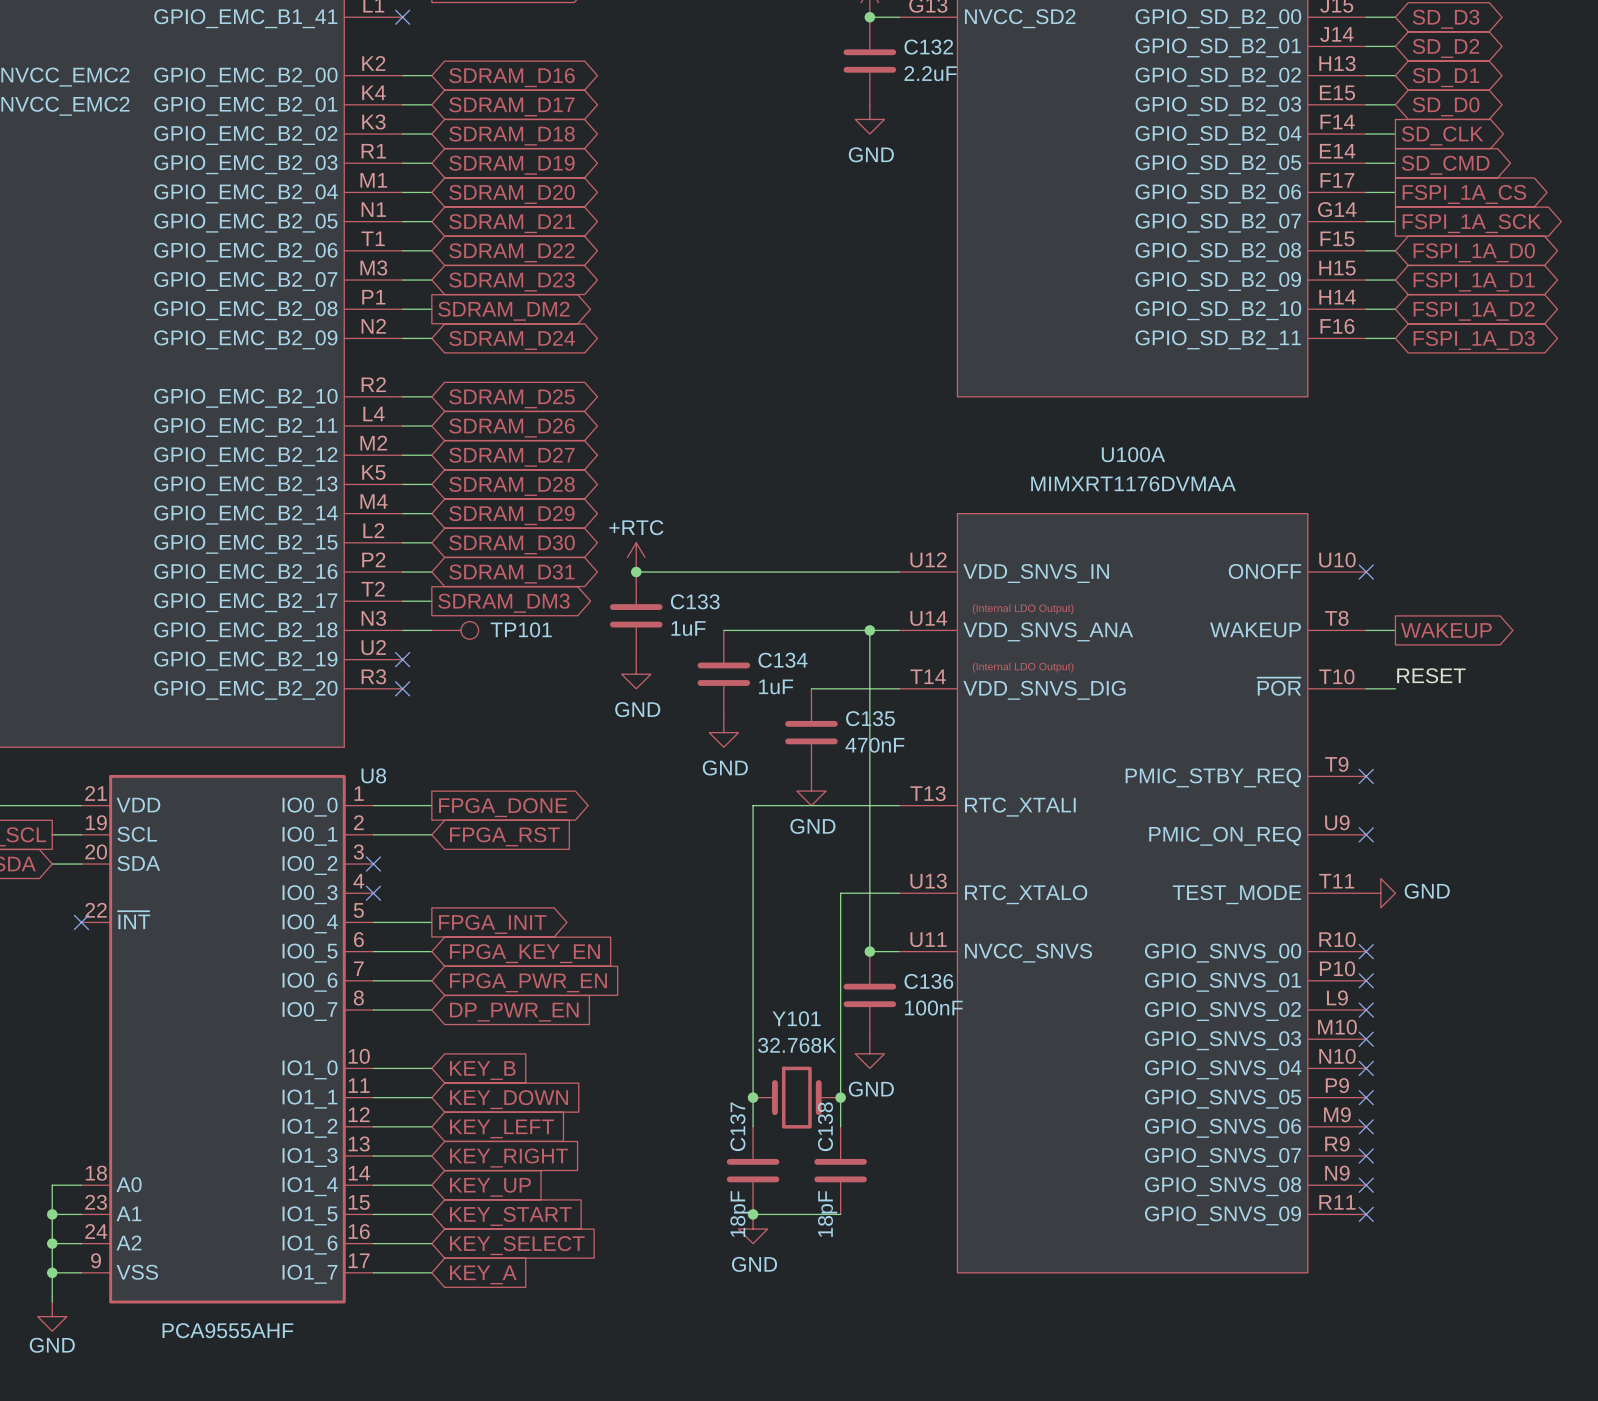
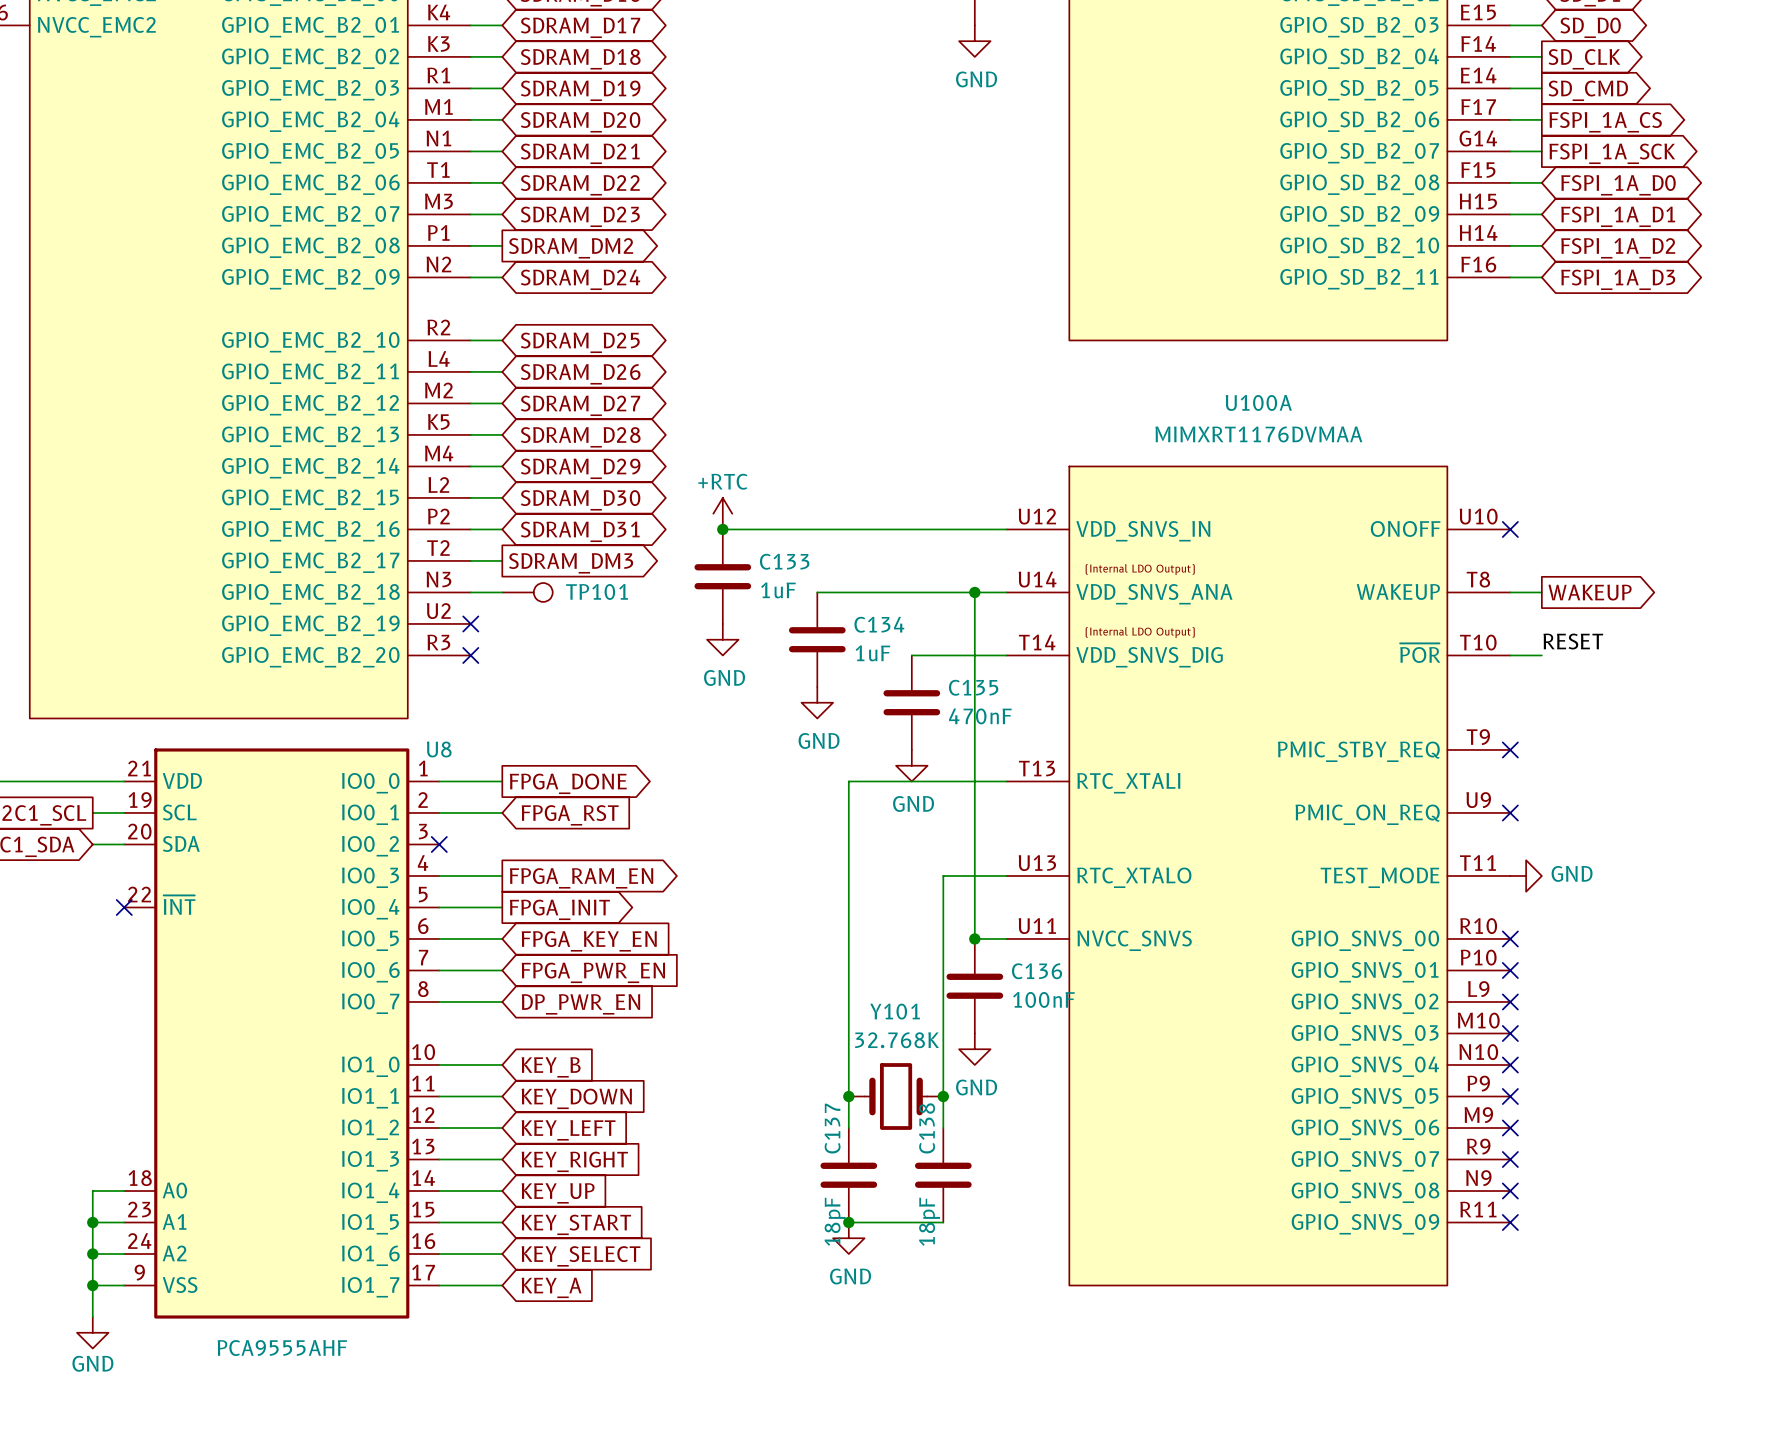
wire: none -> (439, 875) (502, 875)
no-connect mark: (373, 893) -> none
global label: none -> FPGA_RAM_EN (581, 878)

